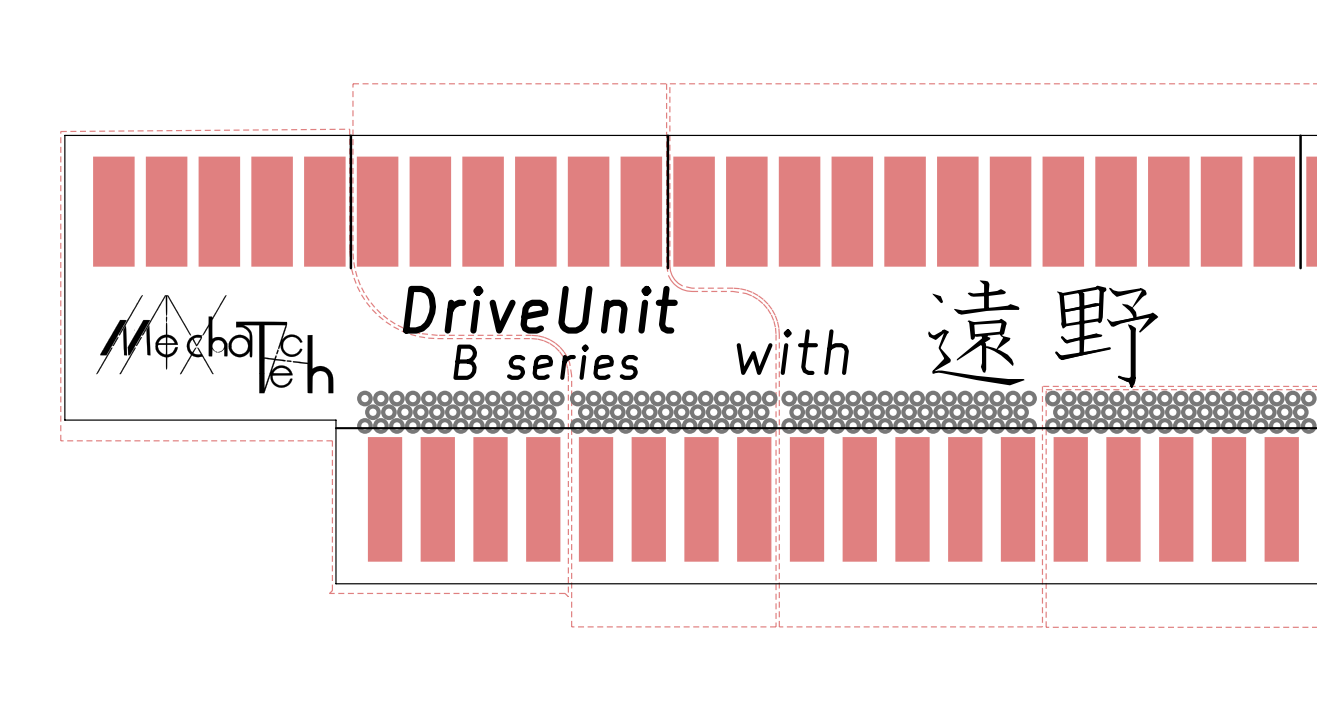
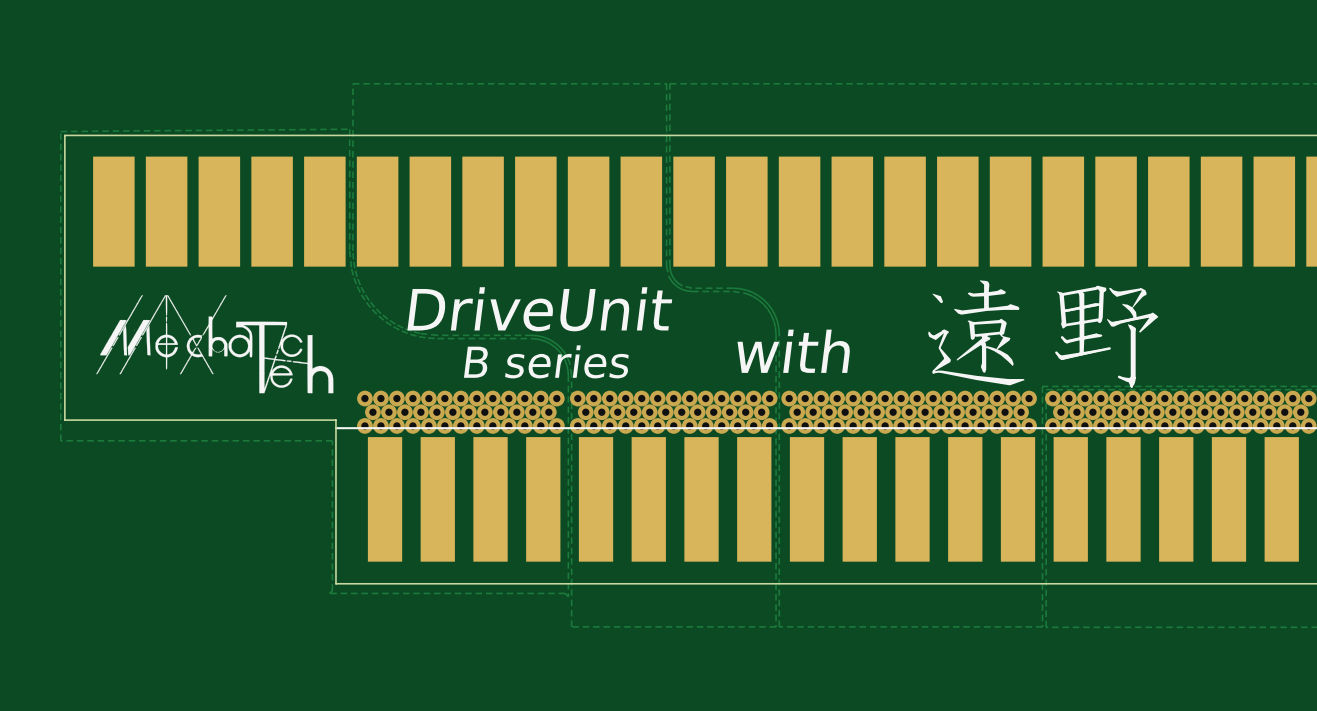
line: (350, 135) (350, 268) -> none
line: (667, 135) (667, 268) -> none
line: (1300, 135) (1300, 268) -> none

